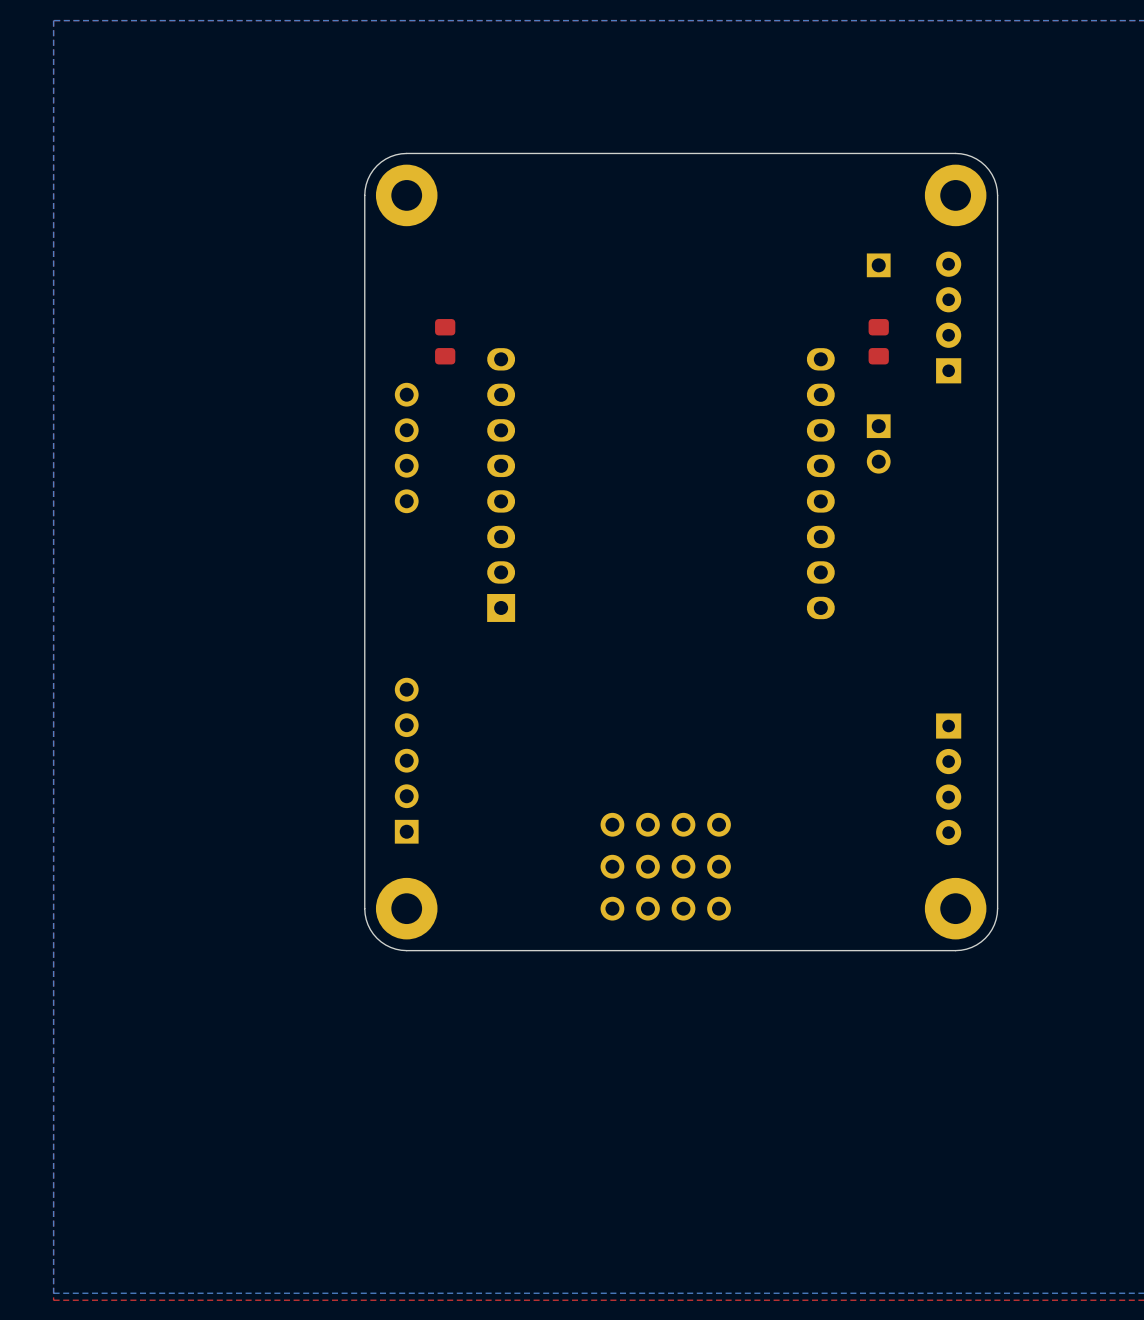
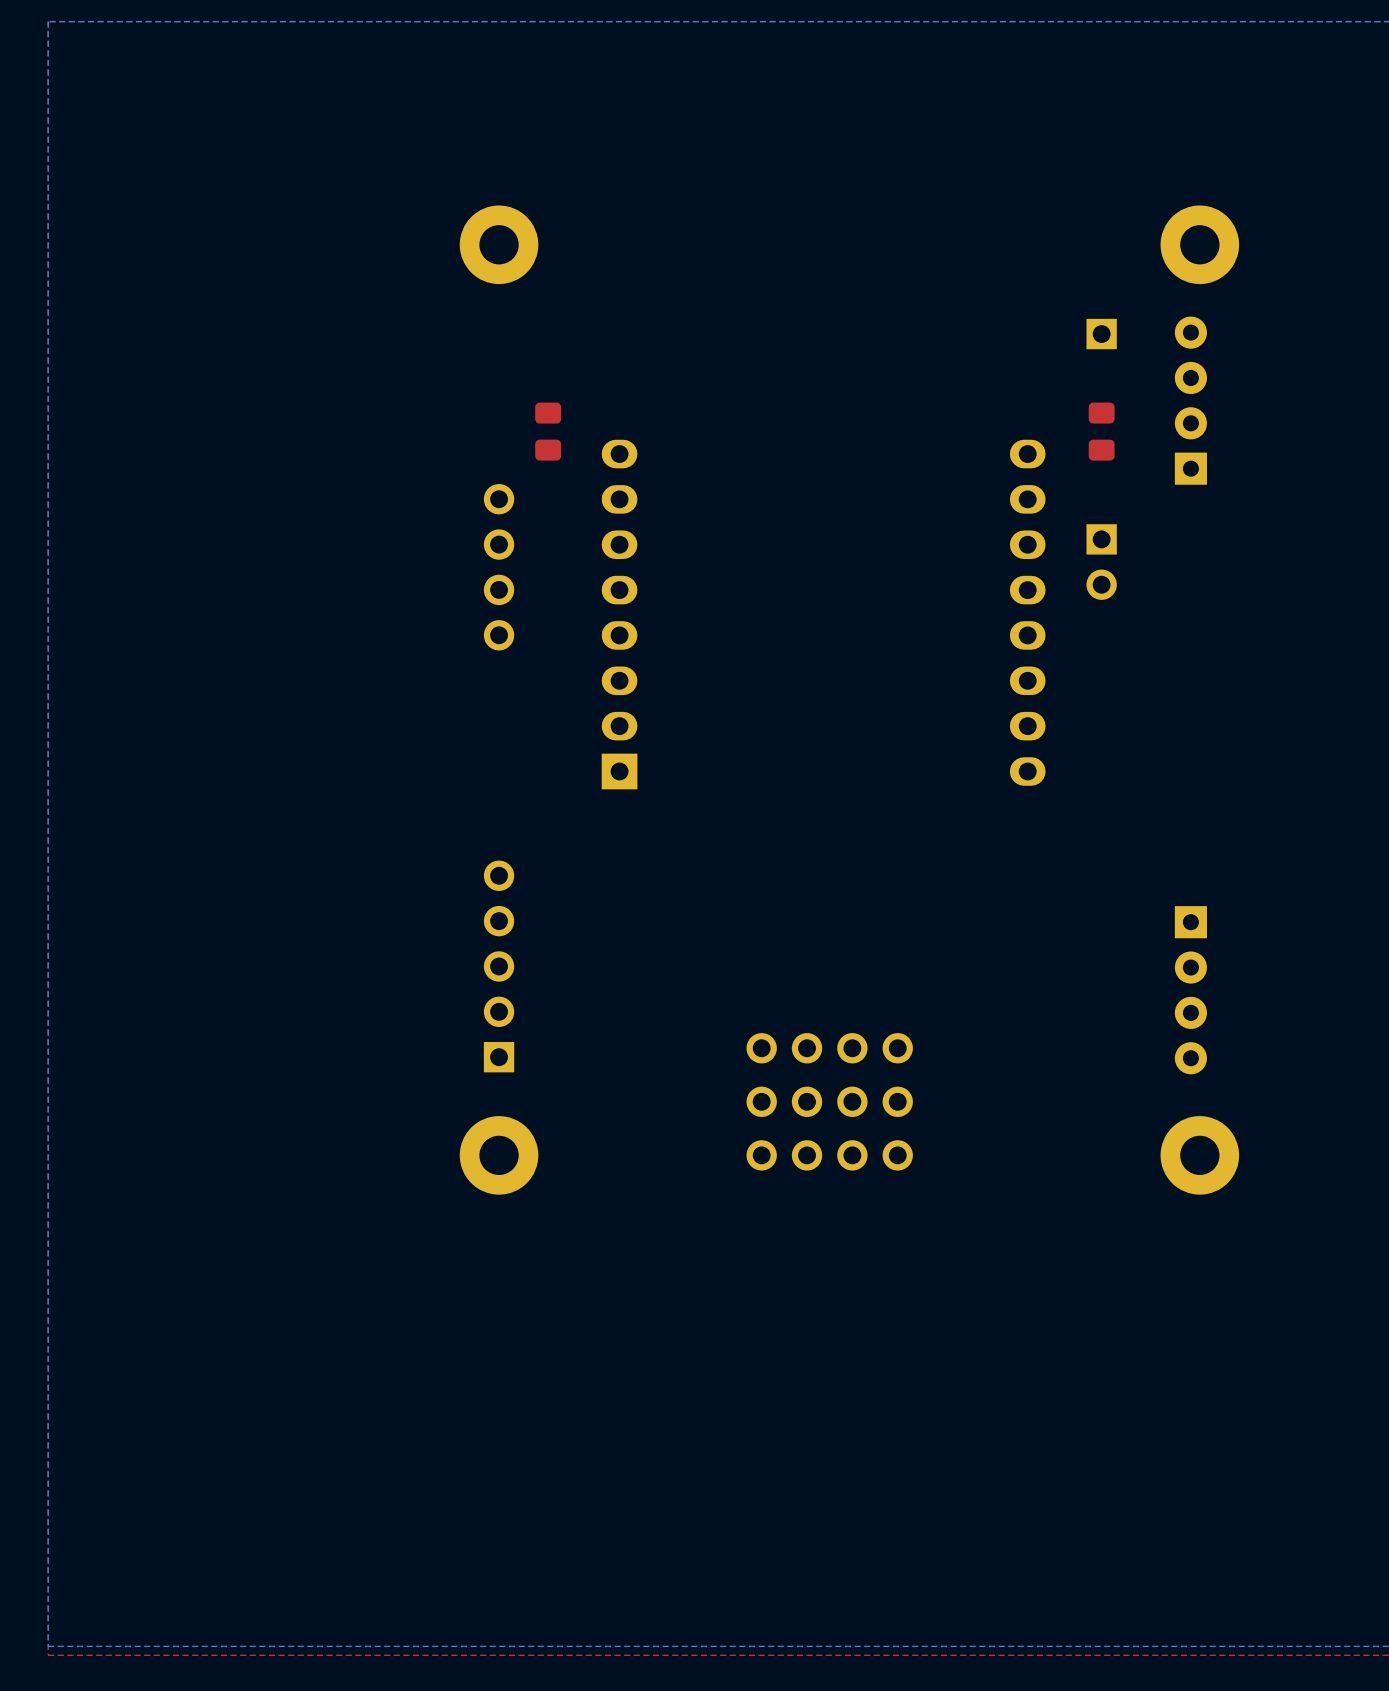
board edge: (955, 153) (406, 153) (385, 159) (373, 169) (367, 179) (364, 195) (364, 908) (367, 924) (381, 941) (390, 947) (406, 950) (955, 950) (971, 947) (988, 934) (996, 919) (997, 908) (997, 195) (994, 179) (985, 165) (971, 156) (955, 153) -> none

